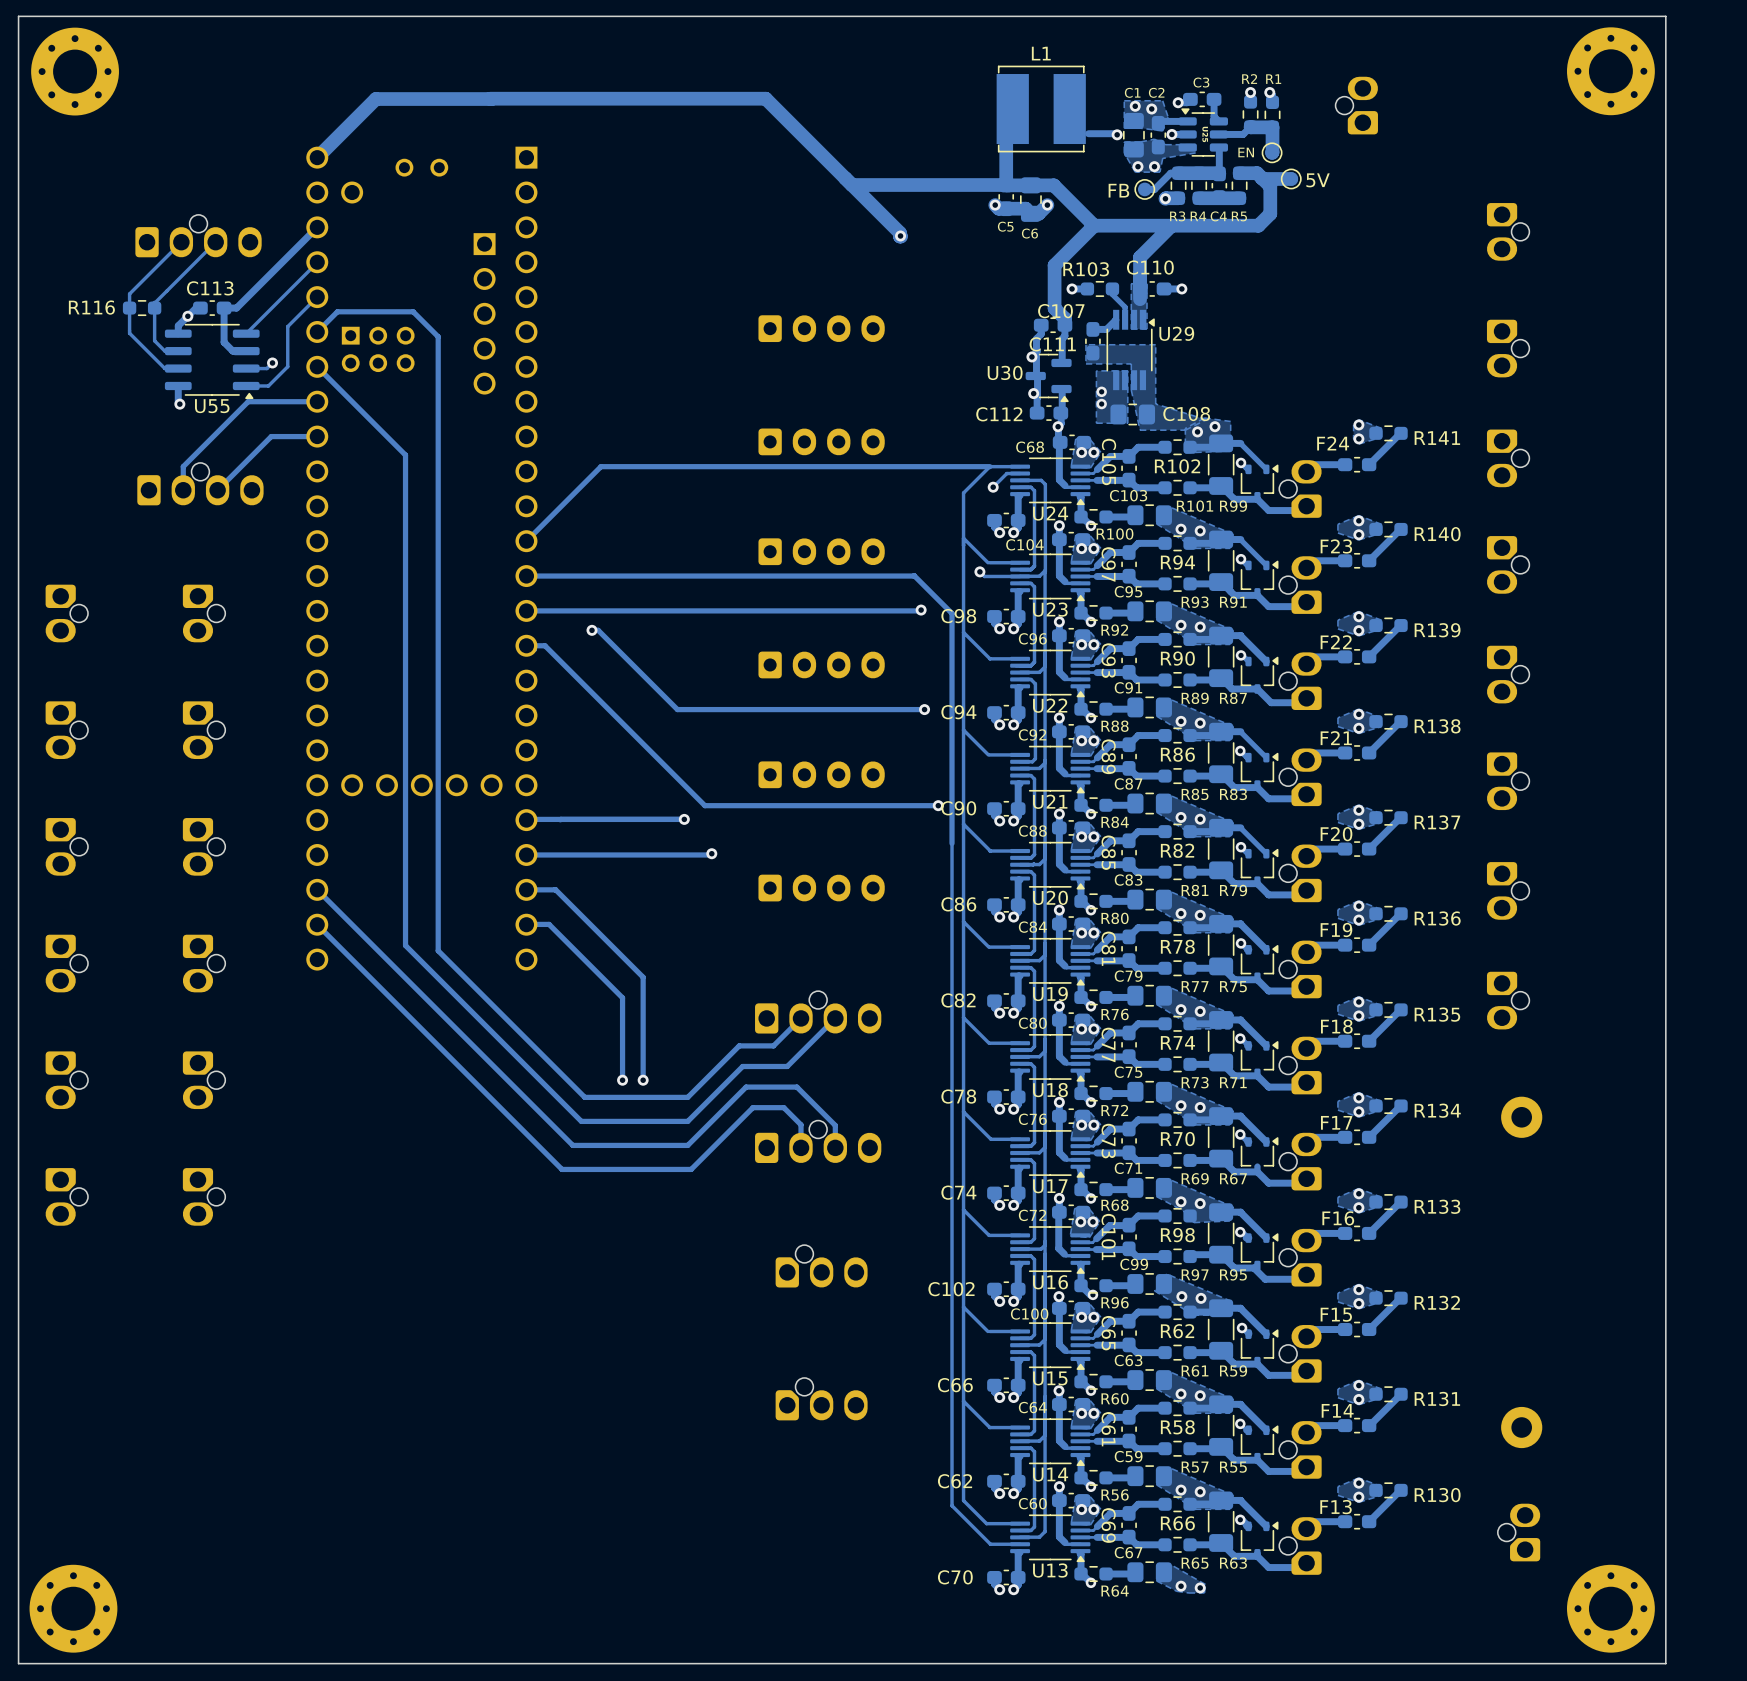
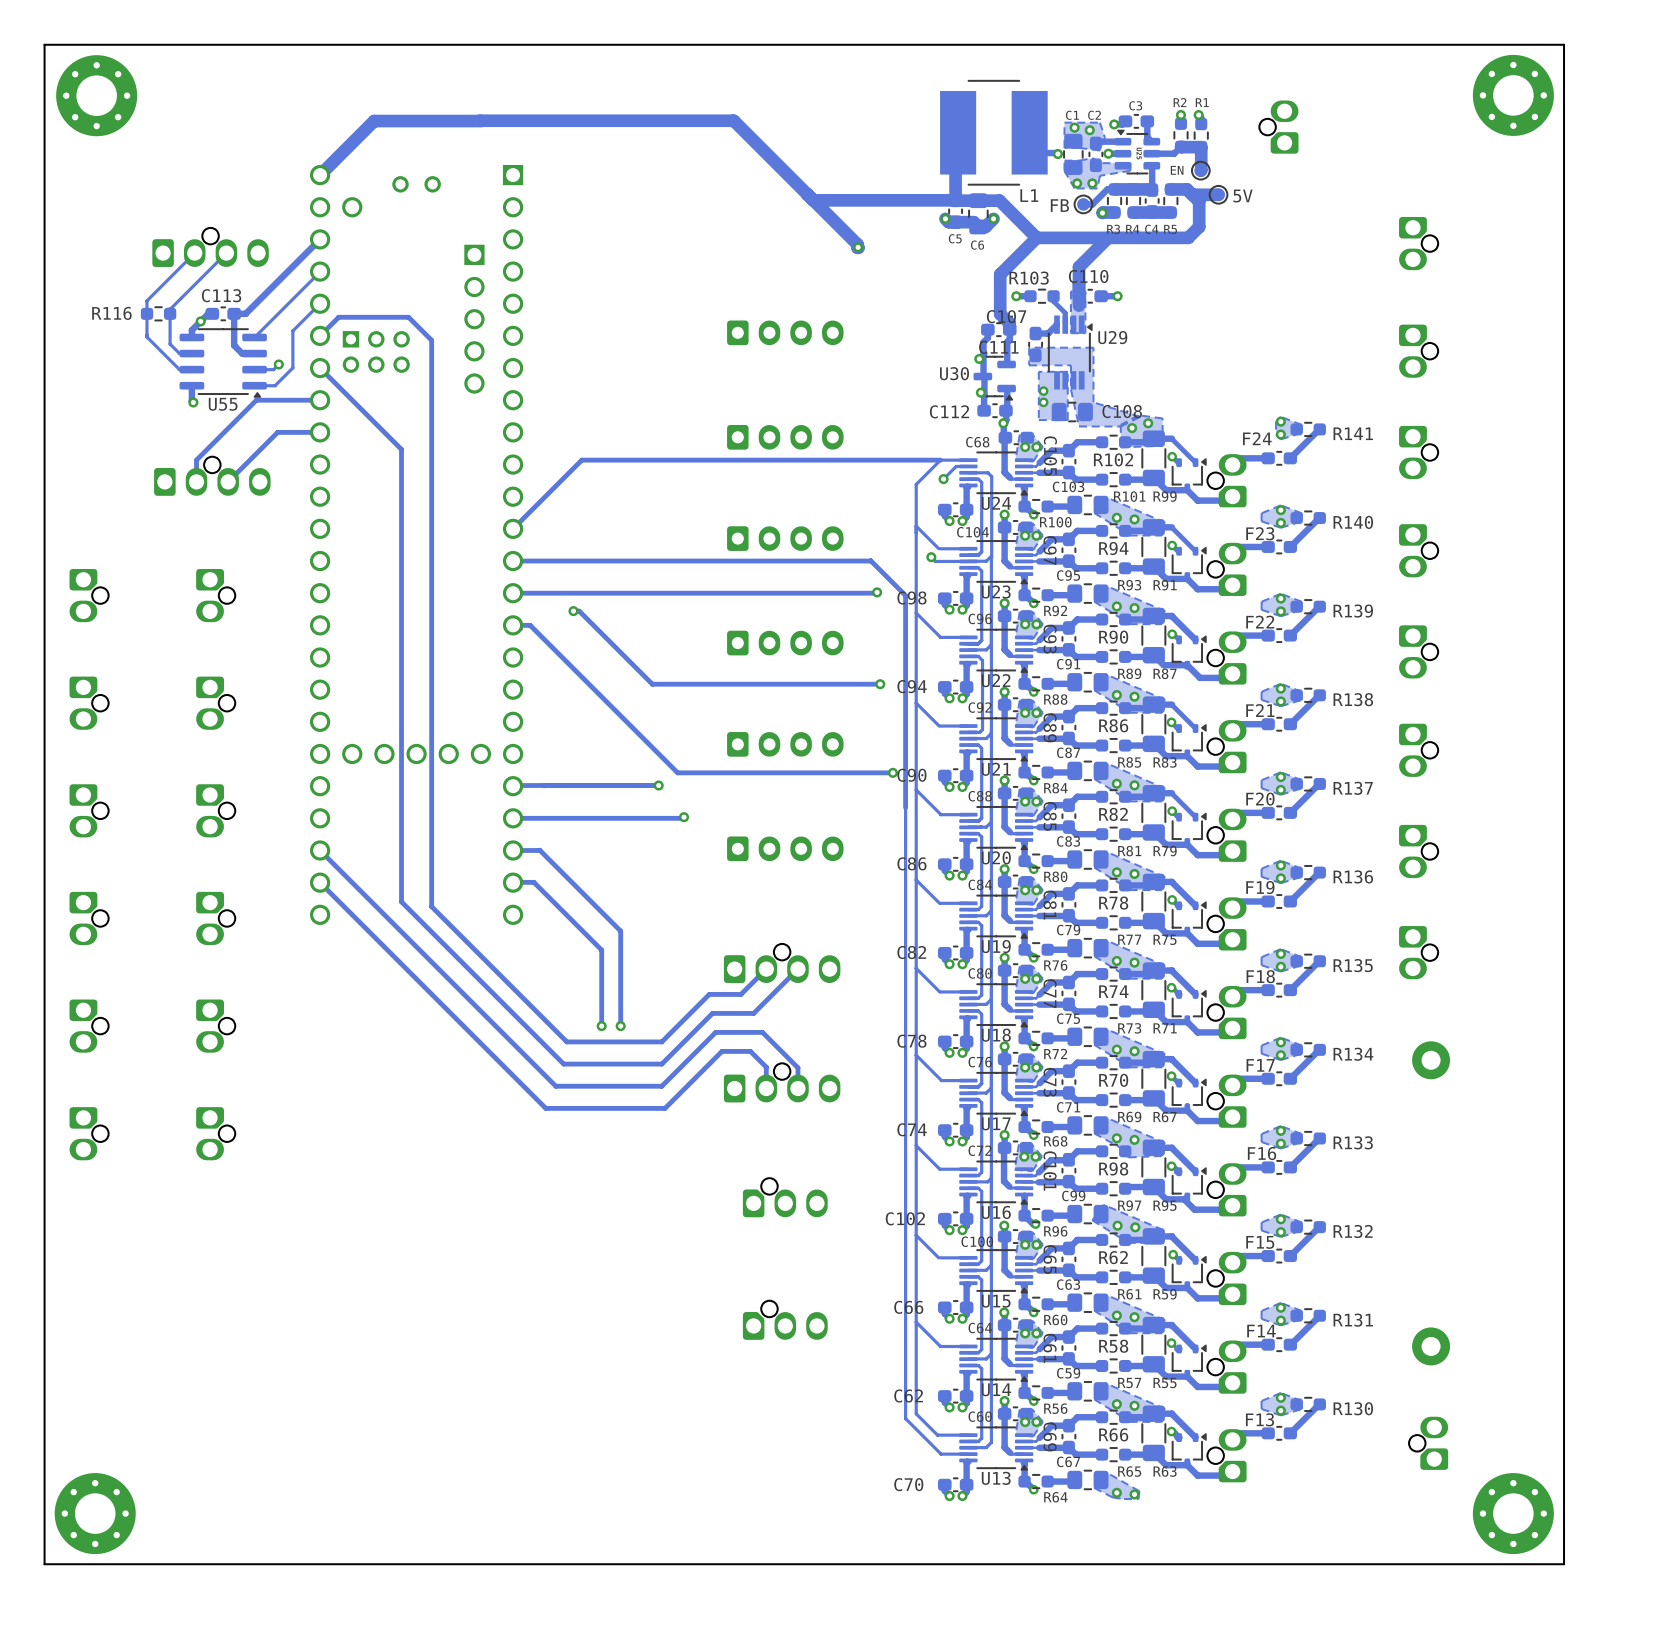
L1 name position: L1 (1041, 53) -> L1 (1029, 195)
L1 footprint: [996, 65, 1086, 153] -> [940, 80, 1048, 186]

